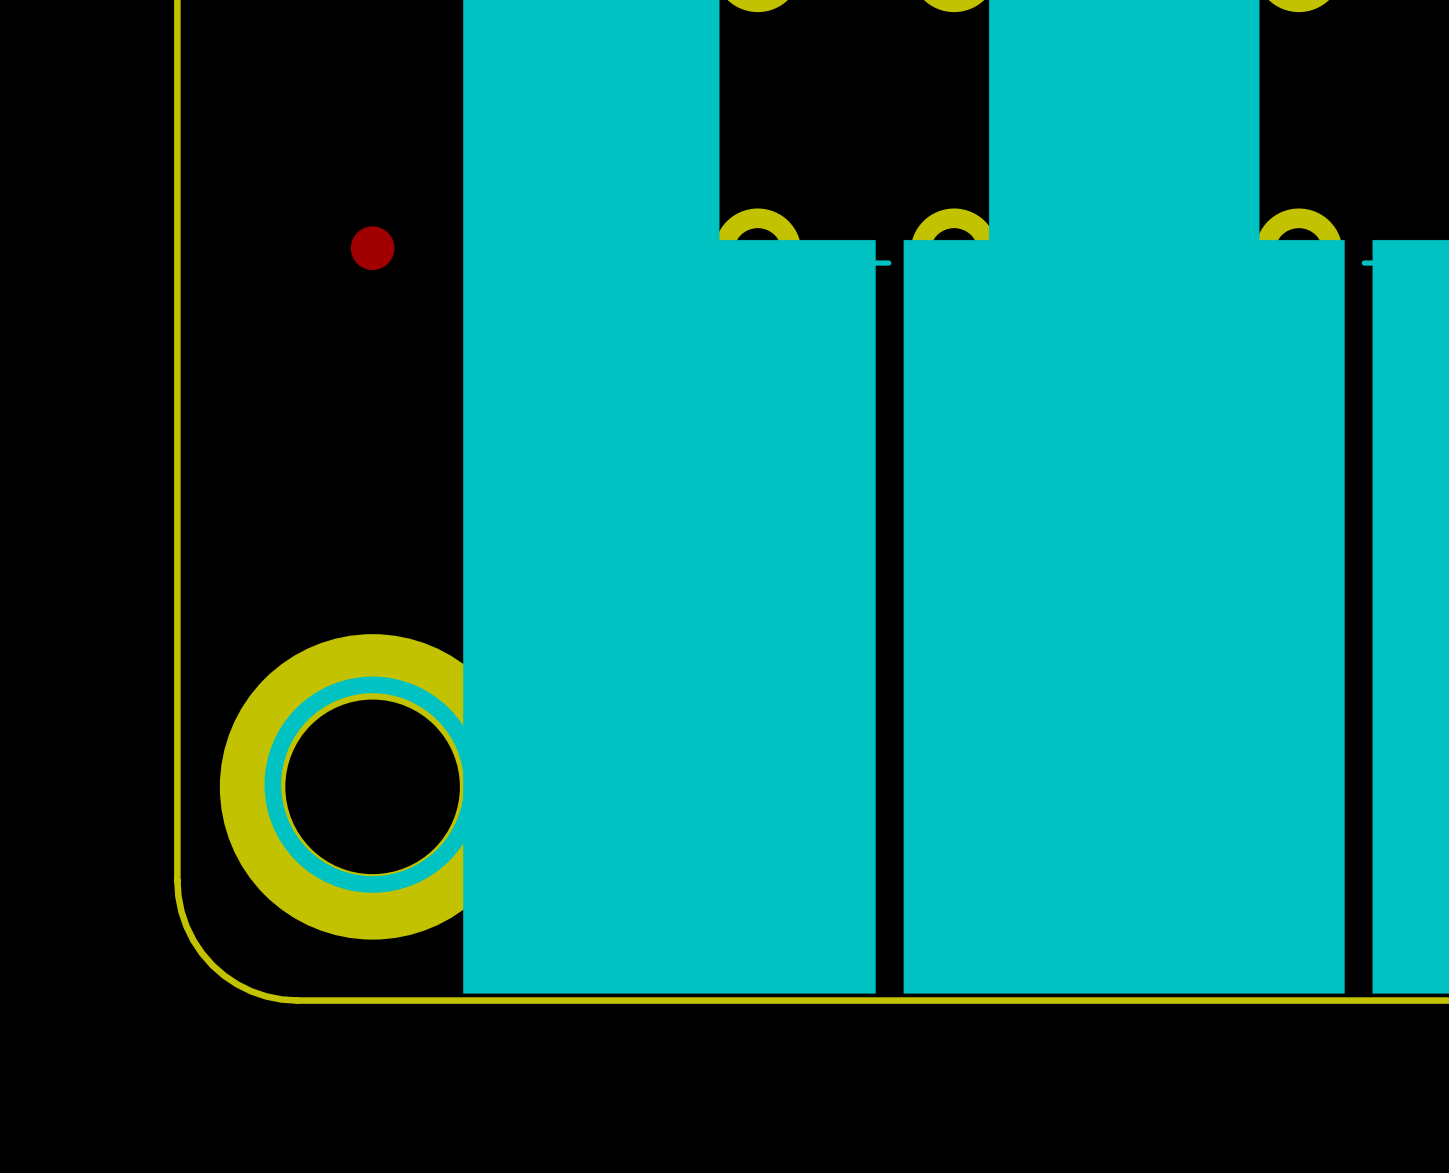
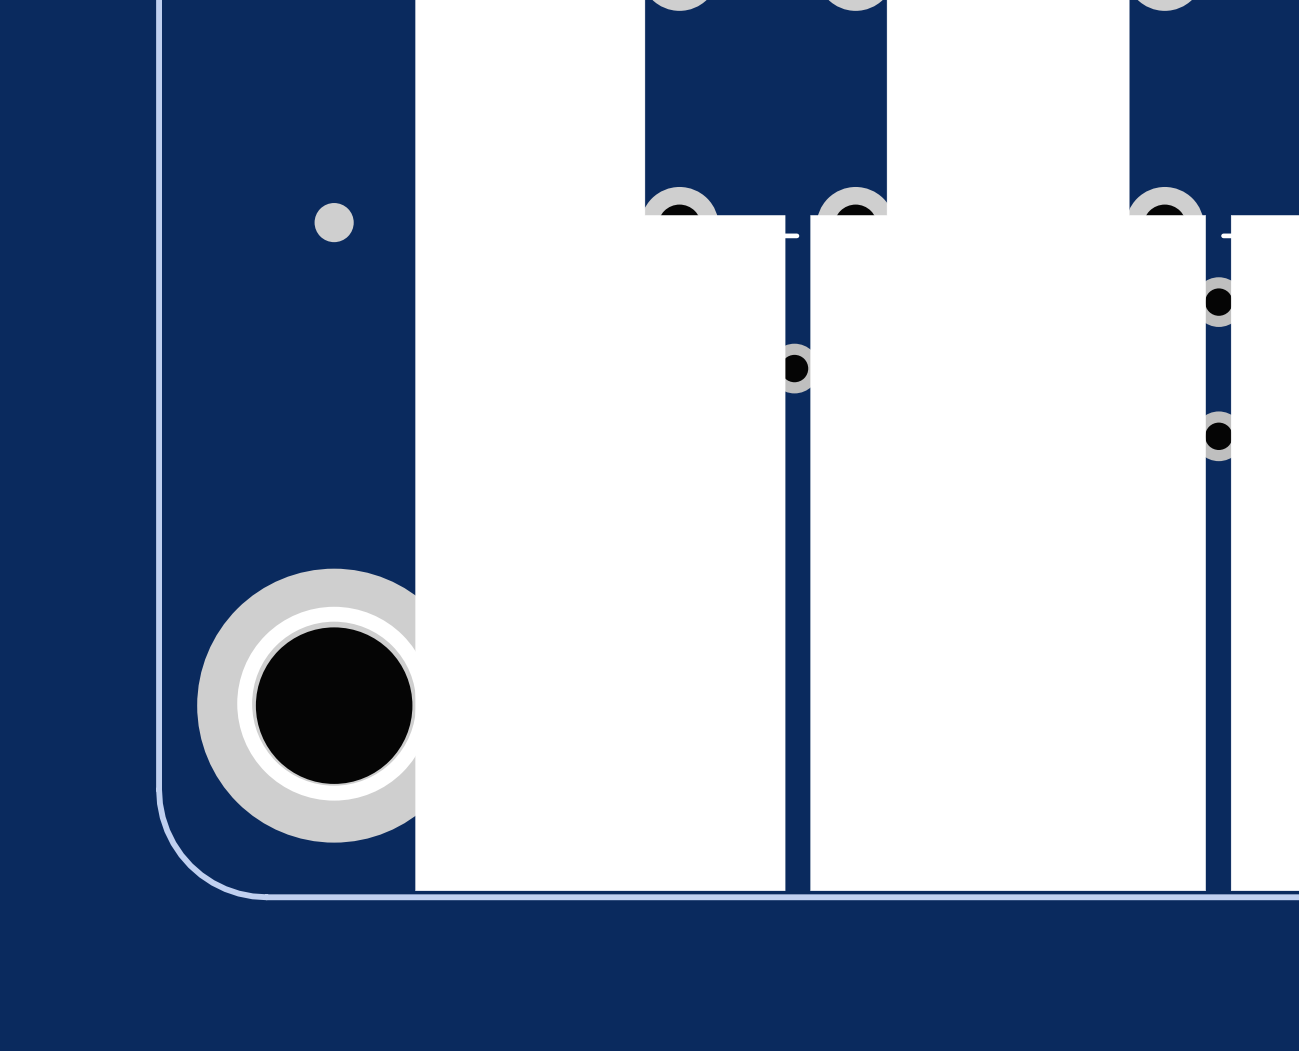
via: none -> (1218, 302)
via: none -> (794, 368)
via: none -> (1218, 436)

